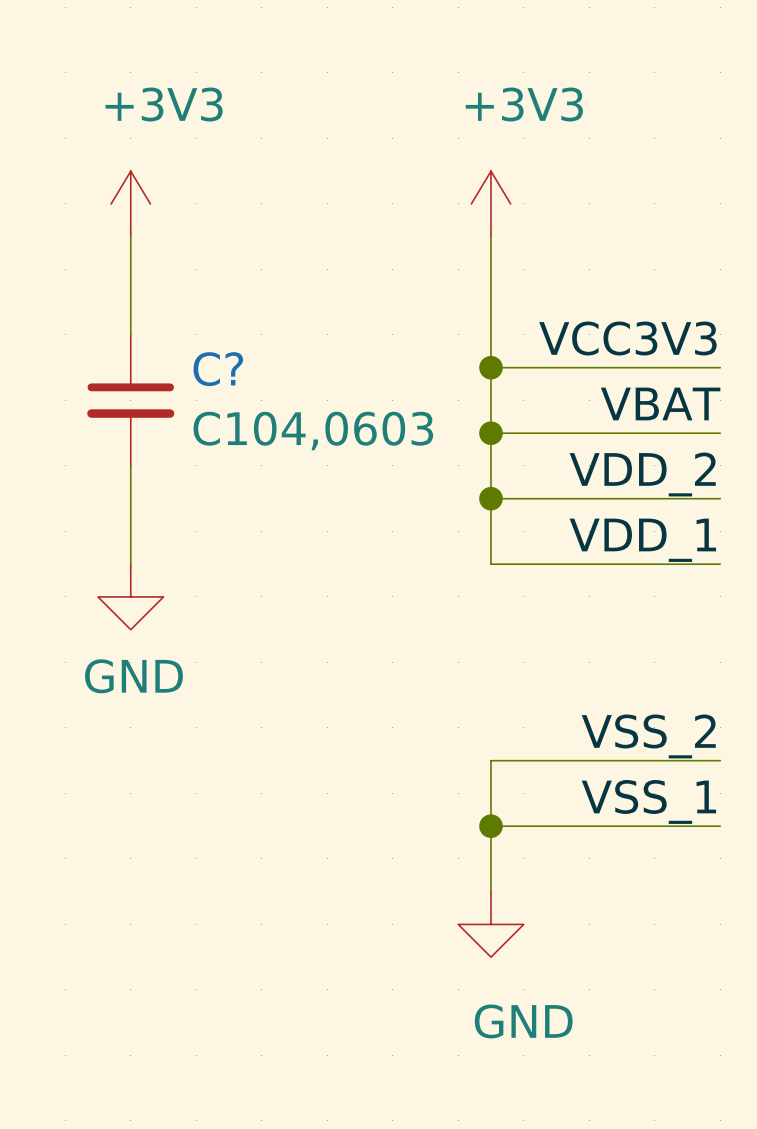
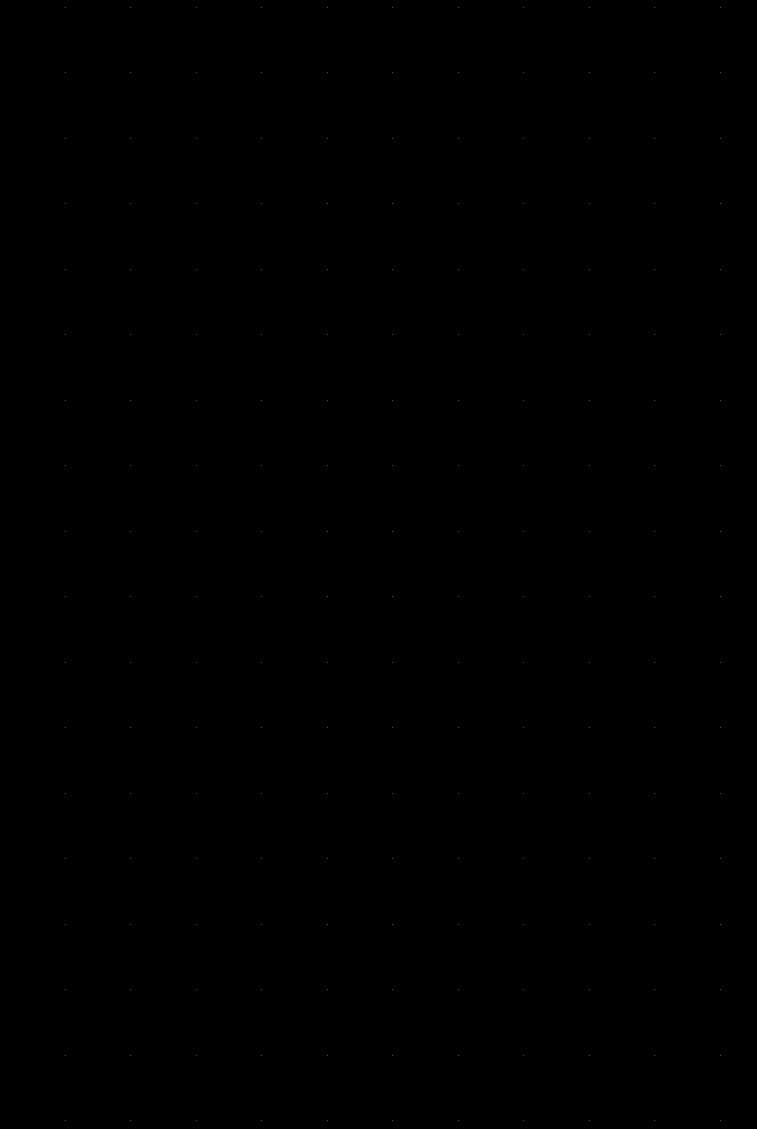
power symbol: +3V3 (130, 203) -> none
power symbol: +3V3 (491, 203) -> none
wire: (130, 236) (130, 334) -> none
wire: (491, 236) (491, 564) (720, 564) -> none
label: VCC3V3 (627, 338) -> none
wire: (491, 367) (720, 367) -> none
junction: (491, 367) -> none
C?: C104,0603 (130, 400) -> none
label: VBAT (660, 403) -> none
wire: (491, 433) (720, 433) -> none
junction: (491, 433) -> none
wire: (130, 465) (130, 564) -> none
label: VDD_2 (642, 474) -> none
wire: (491, 498) (720, 498) -> none
junction: (491, 498) -> none
label: VDD_1 (642, 540) -> none
power symbol: GND (130, 596) -> none
label: VSS_2 (648, 736) -> none
wire: (720, 760) (491, 760) (491, 891) -> none
label: VSS_1 (648, 801) -> none
wire: (491, 826) (720, 826) -> none
junction: (491, 826) -> none
power symbol: GND (491, 924) -> none

